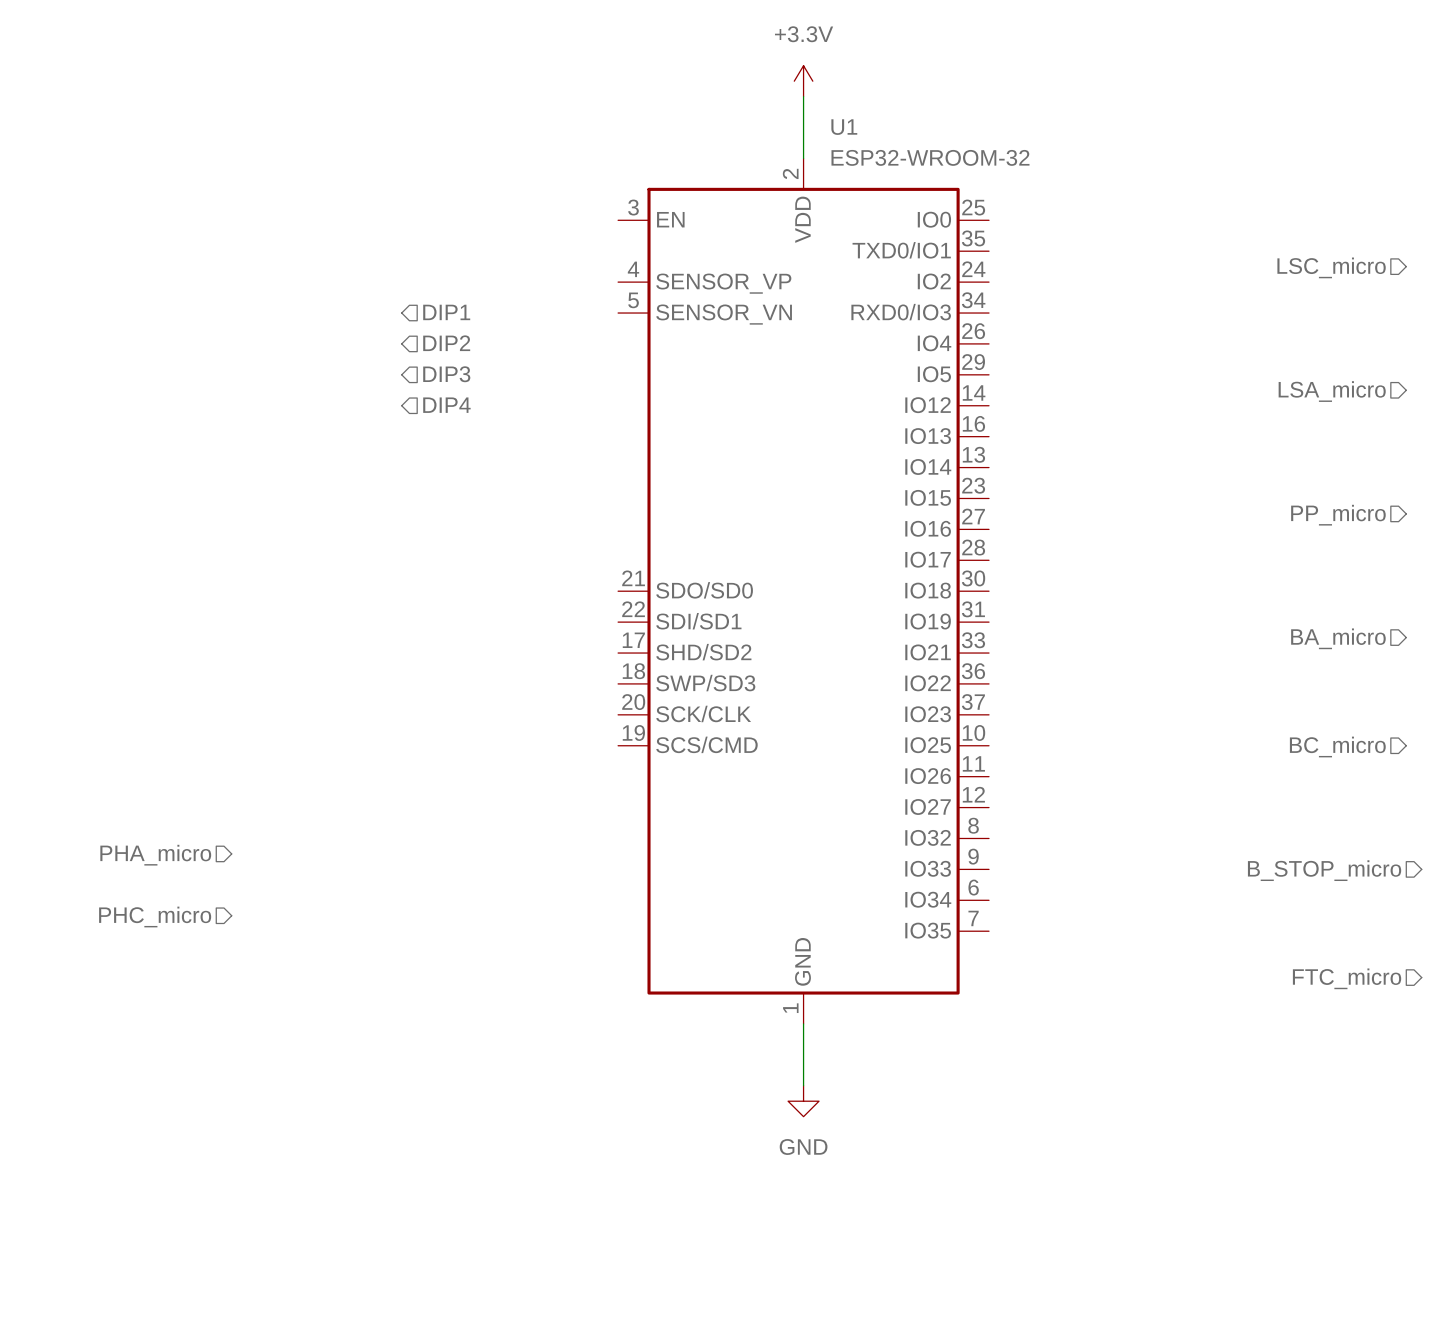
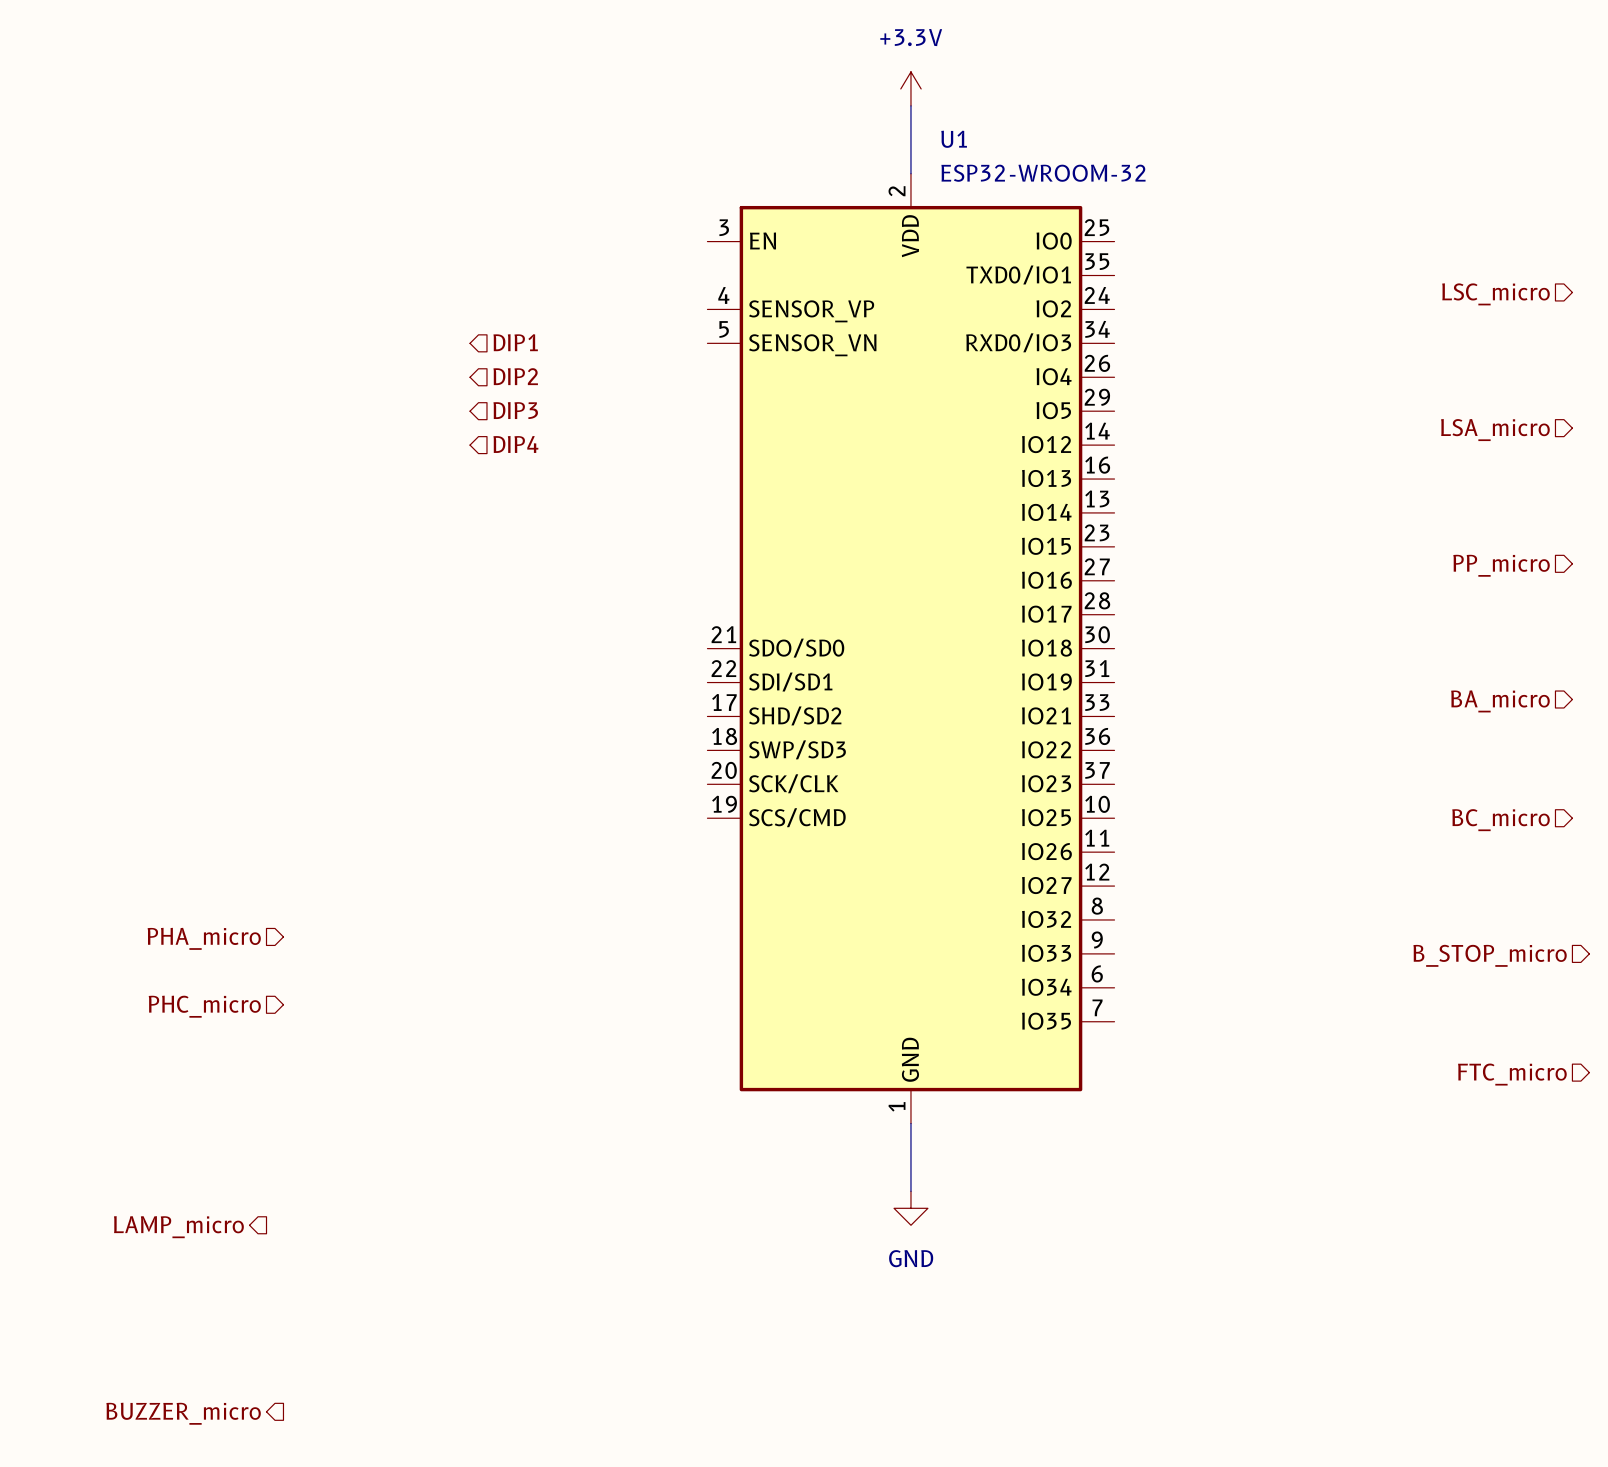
hierarchical label: none -> LAMP_micro (178, 1227)
hierarchical label: none -> BUZZER_micro (183, 1413)

